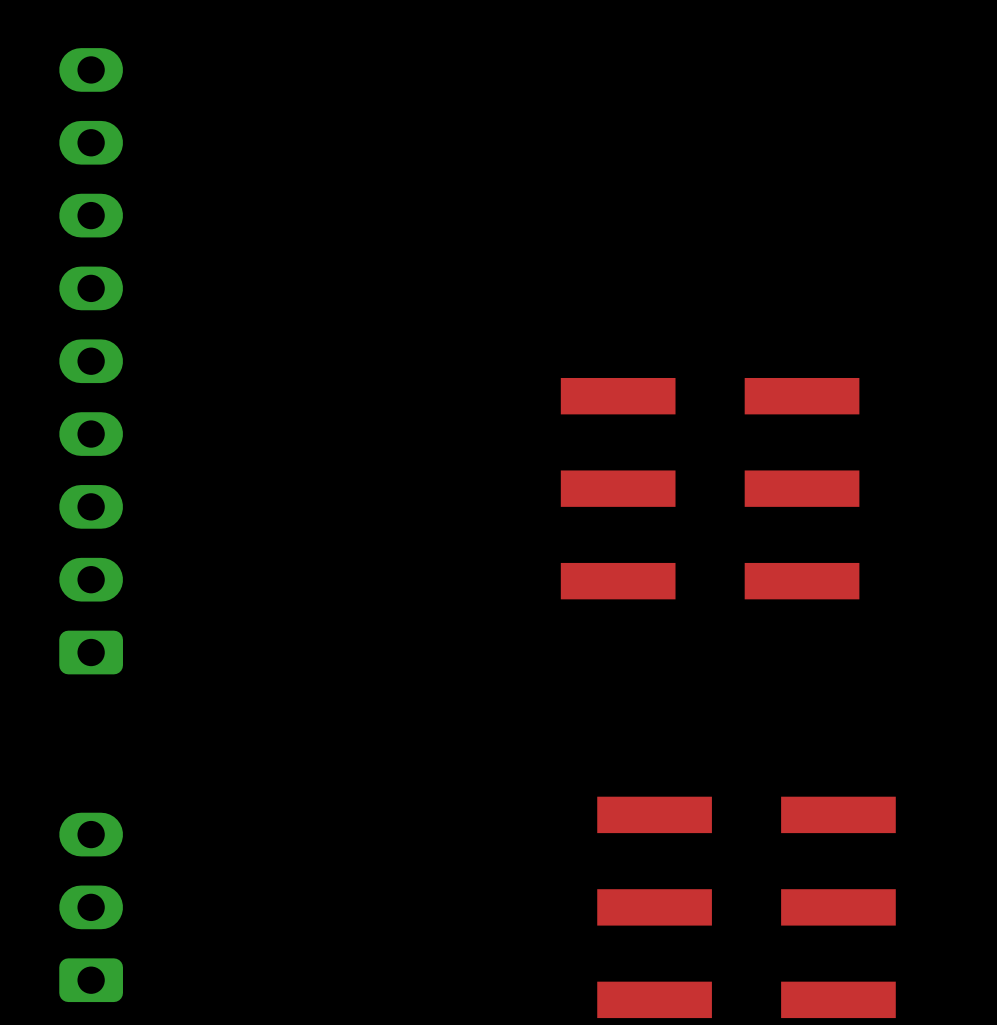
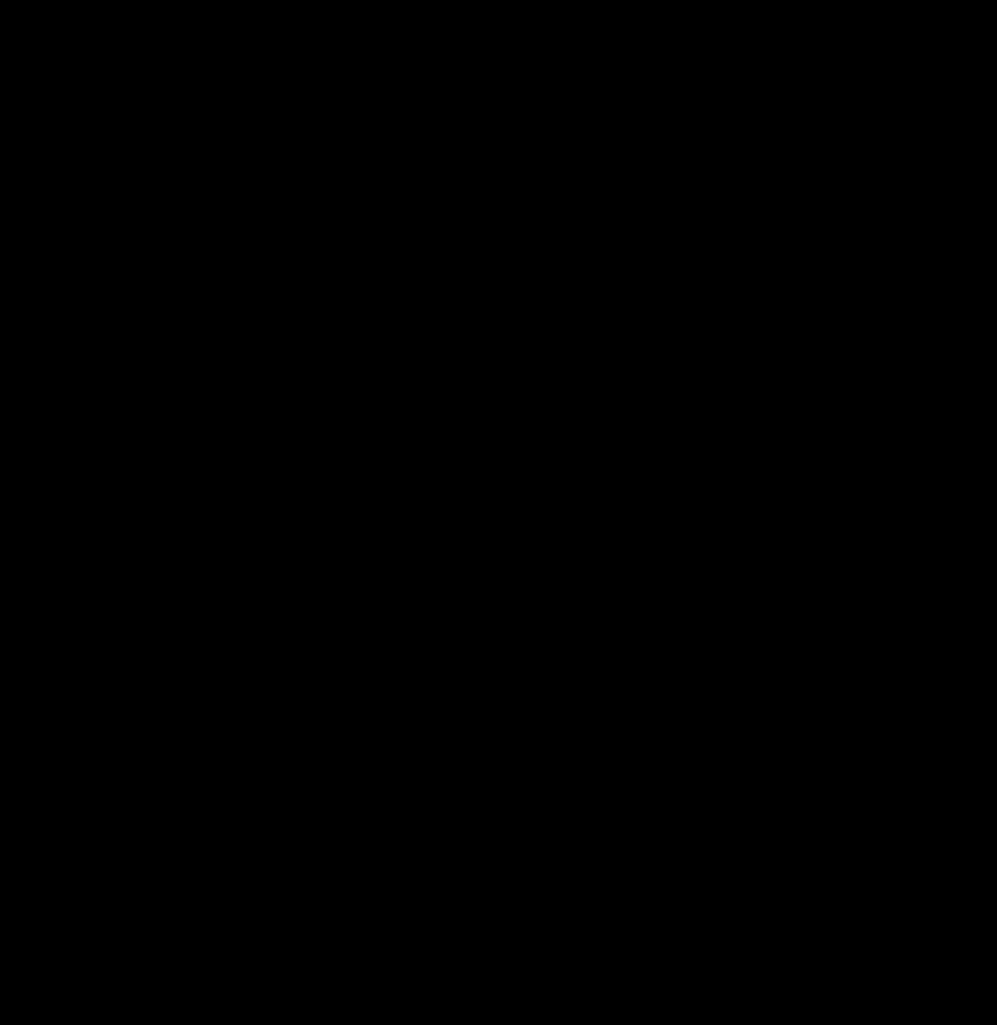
part: (91, 361) -> none
part: (710, 488) -> none
part: (91, 907) -> none
part: (746, 907) -> none

